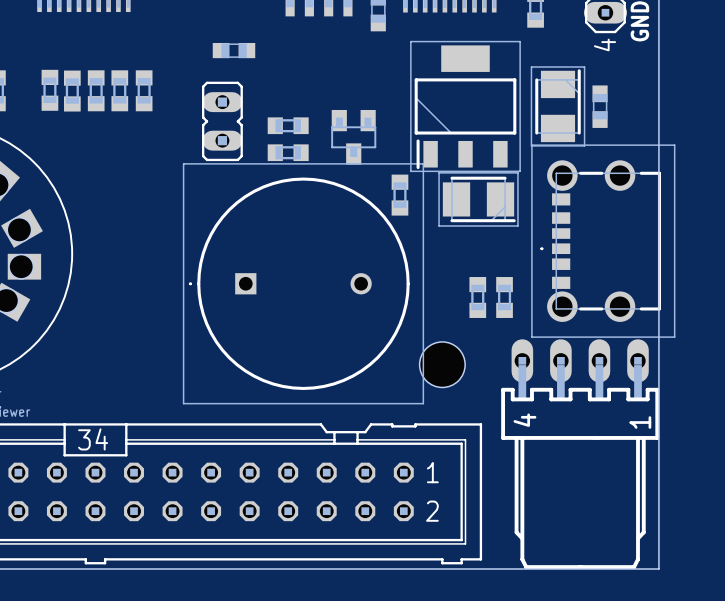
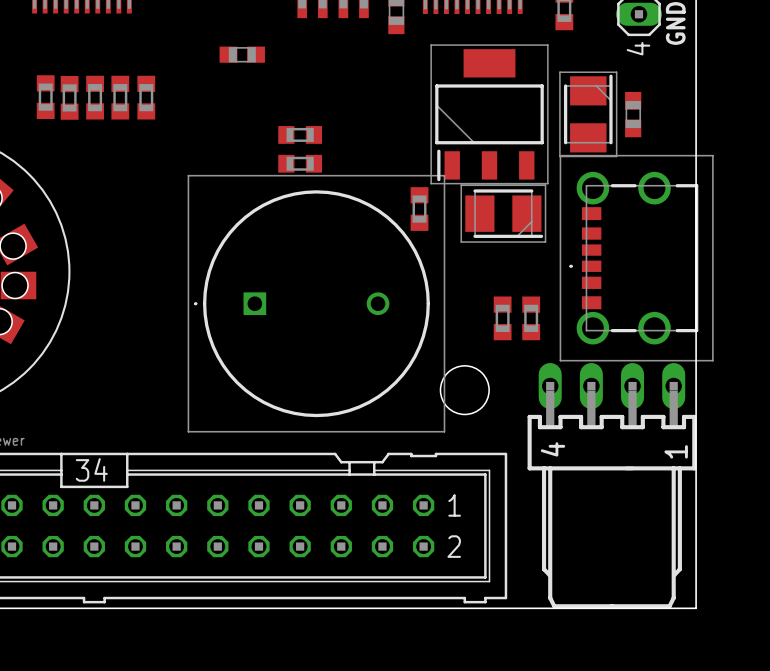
part: (222, 121) -> none
part: (353, 137) -> none

